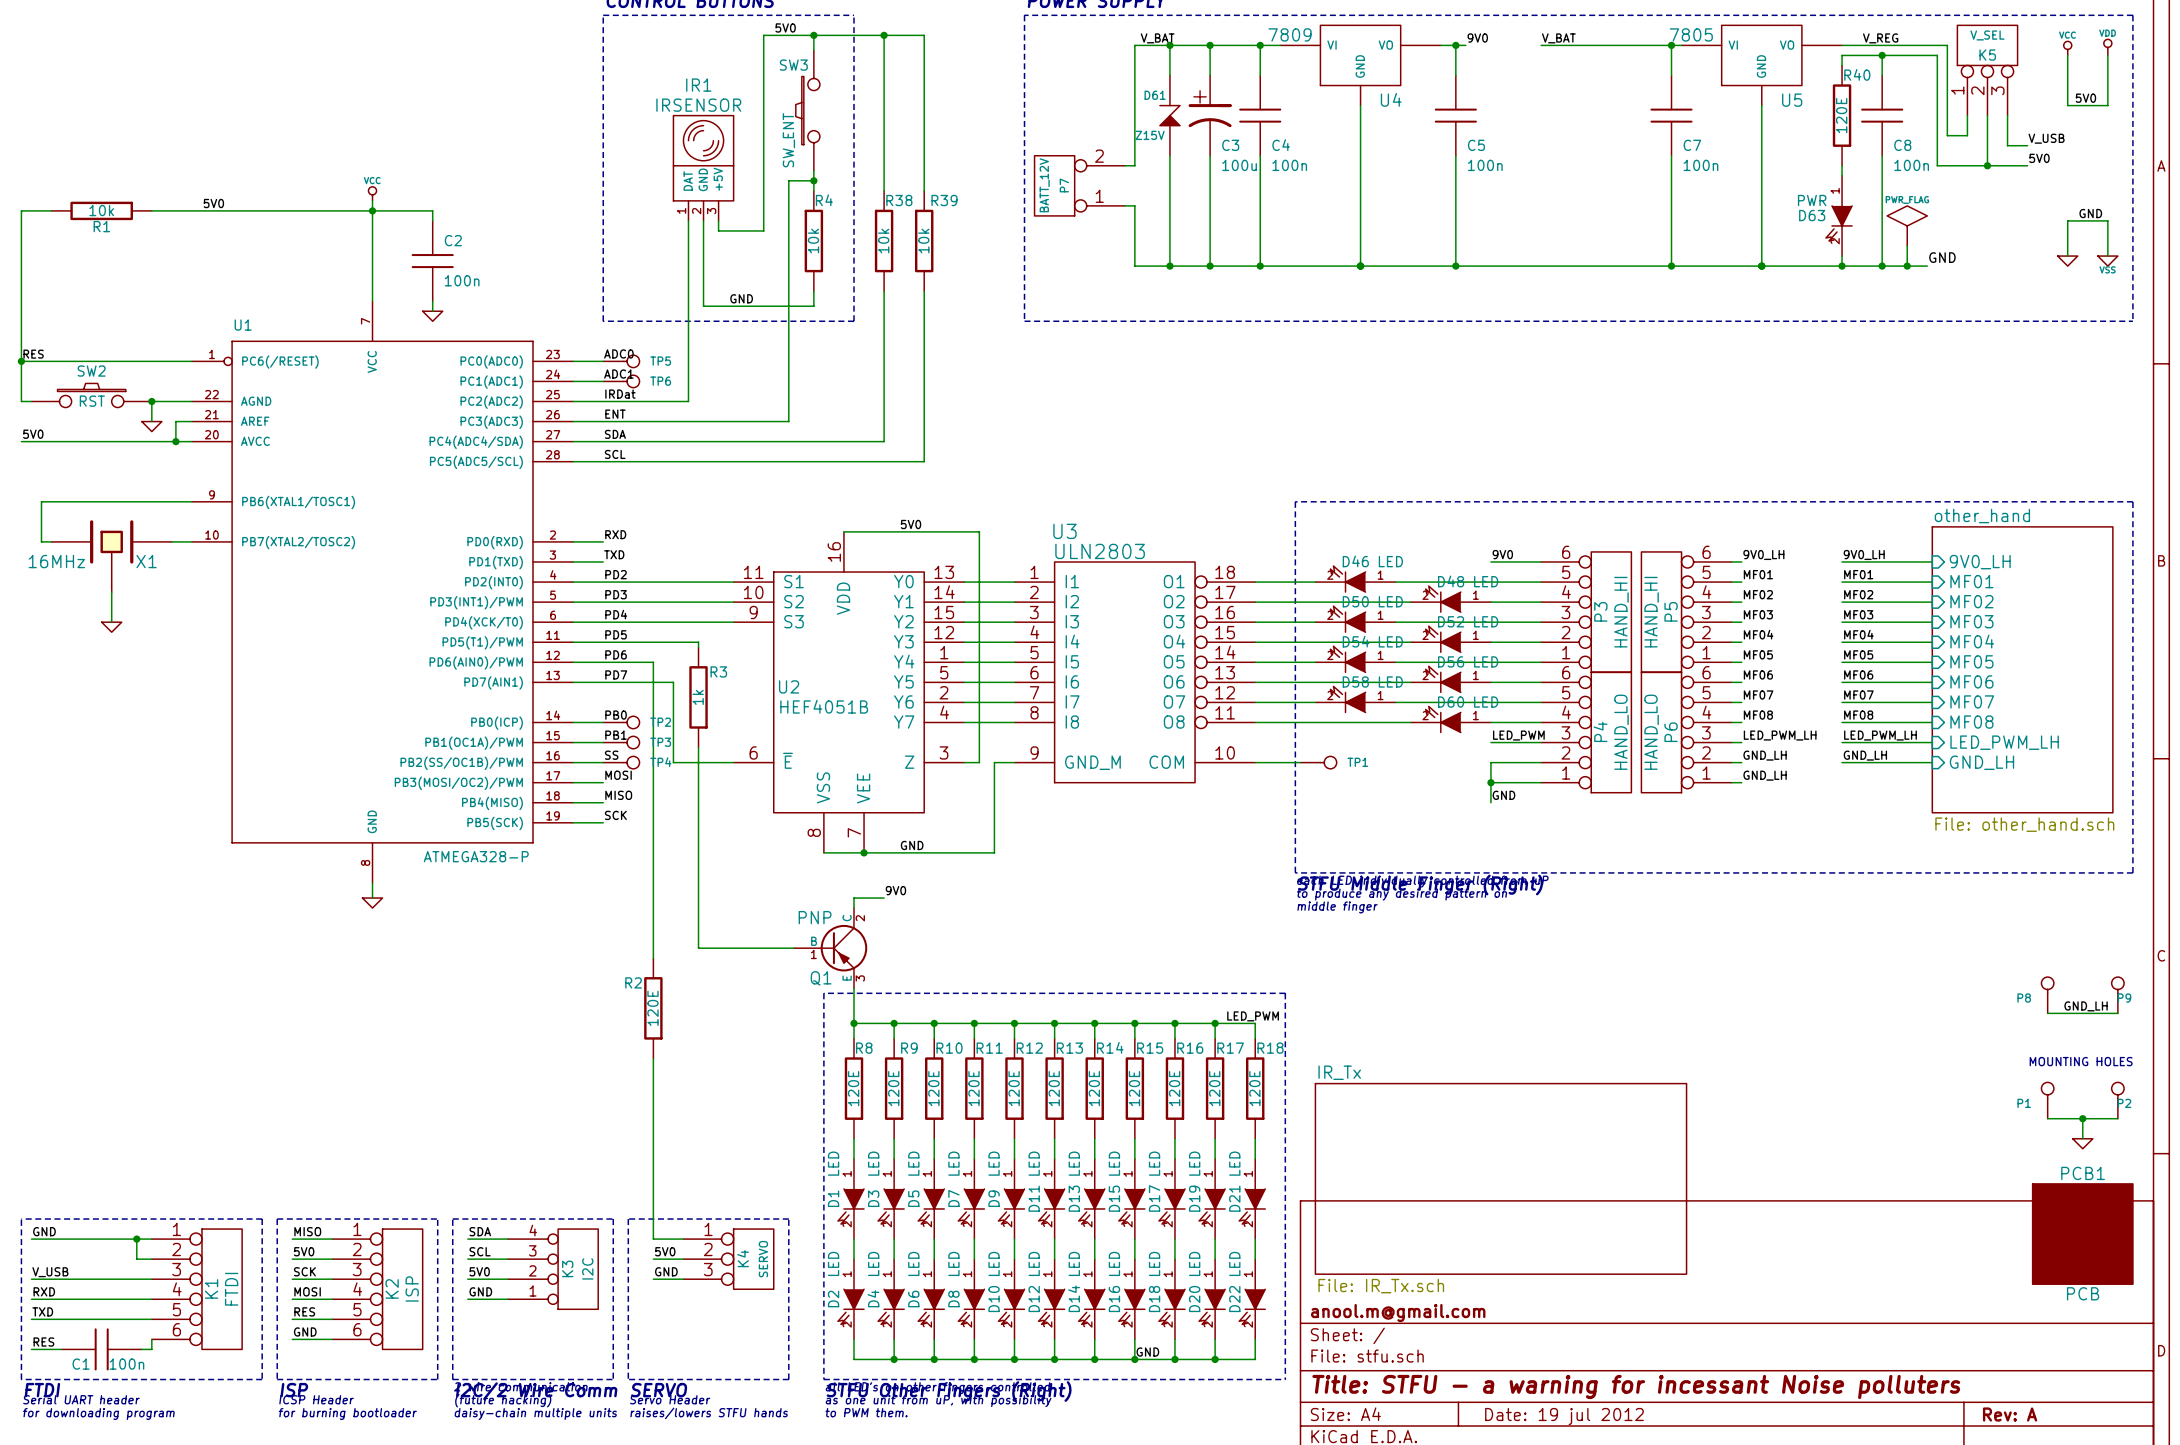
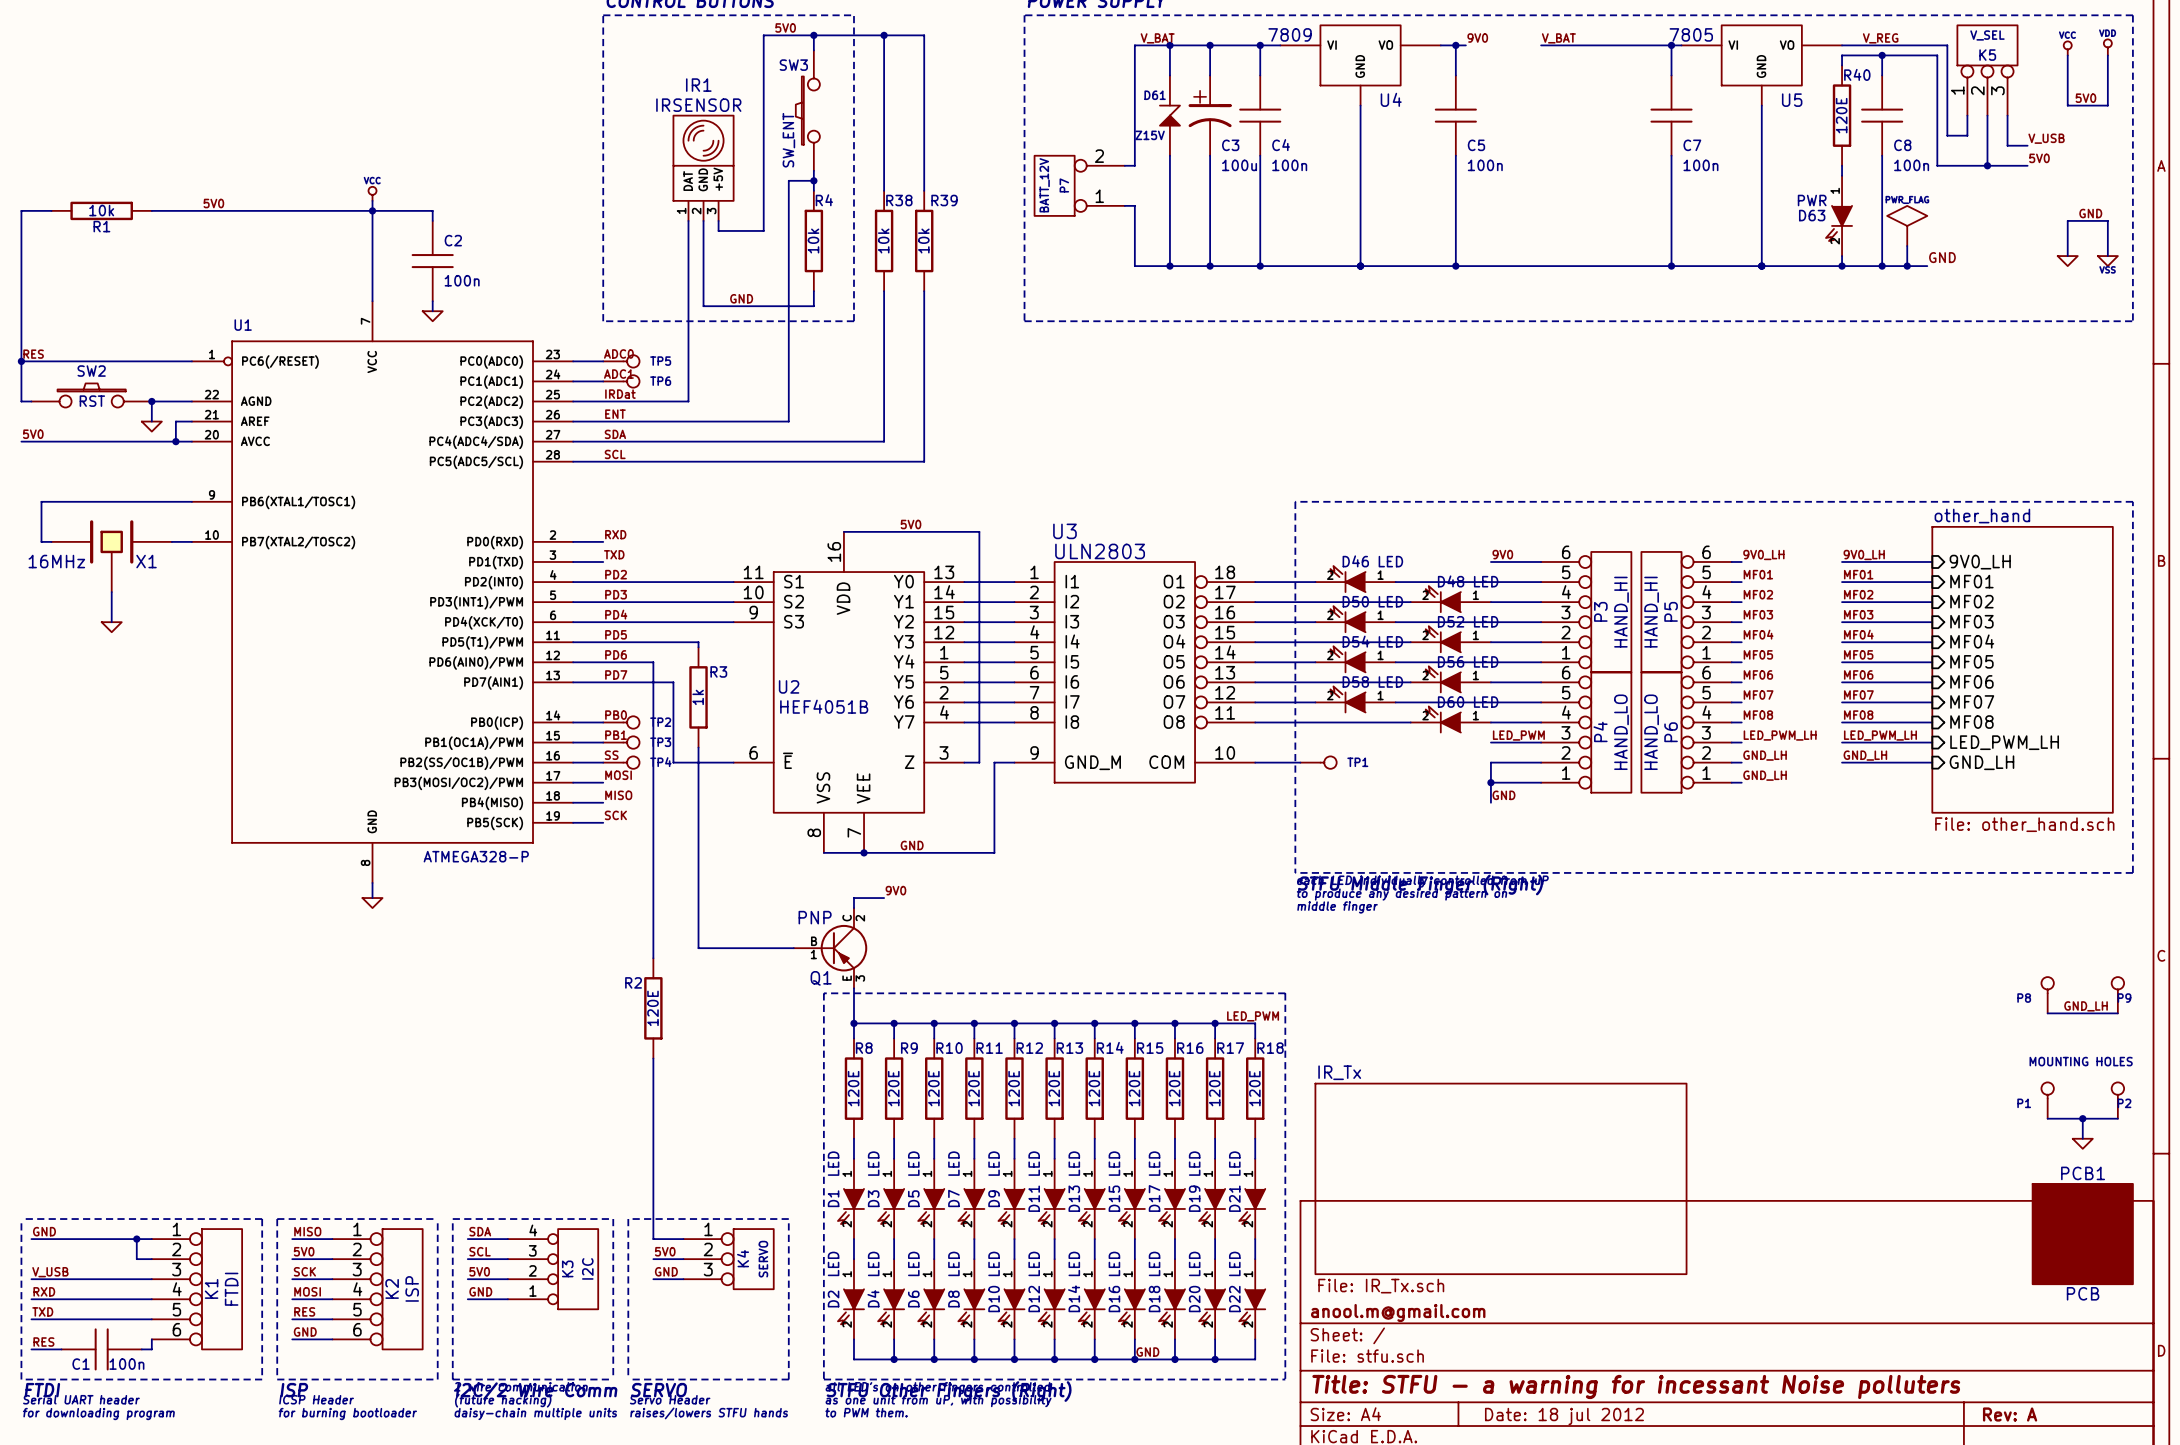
title block: Date: 19 jul 2012 (1564, 1416) -> Date: 18 jul 2012 (1564, 1416)

